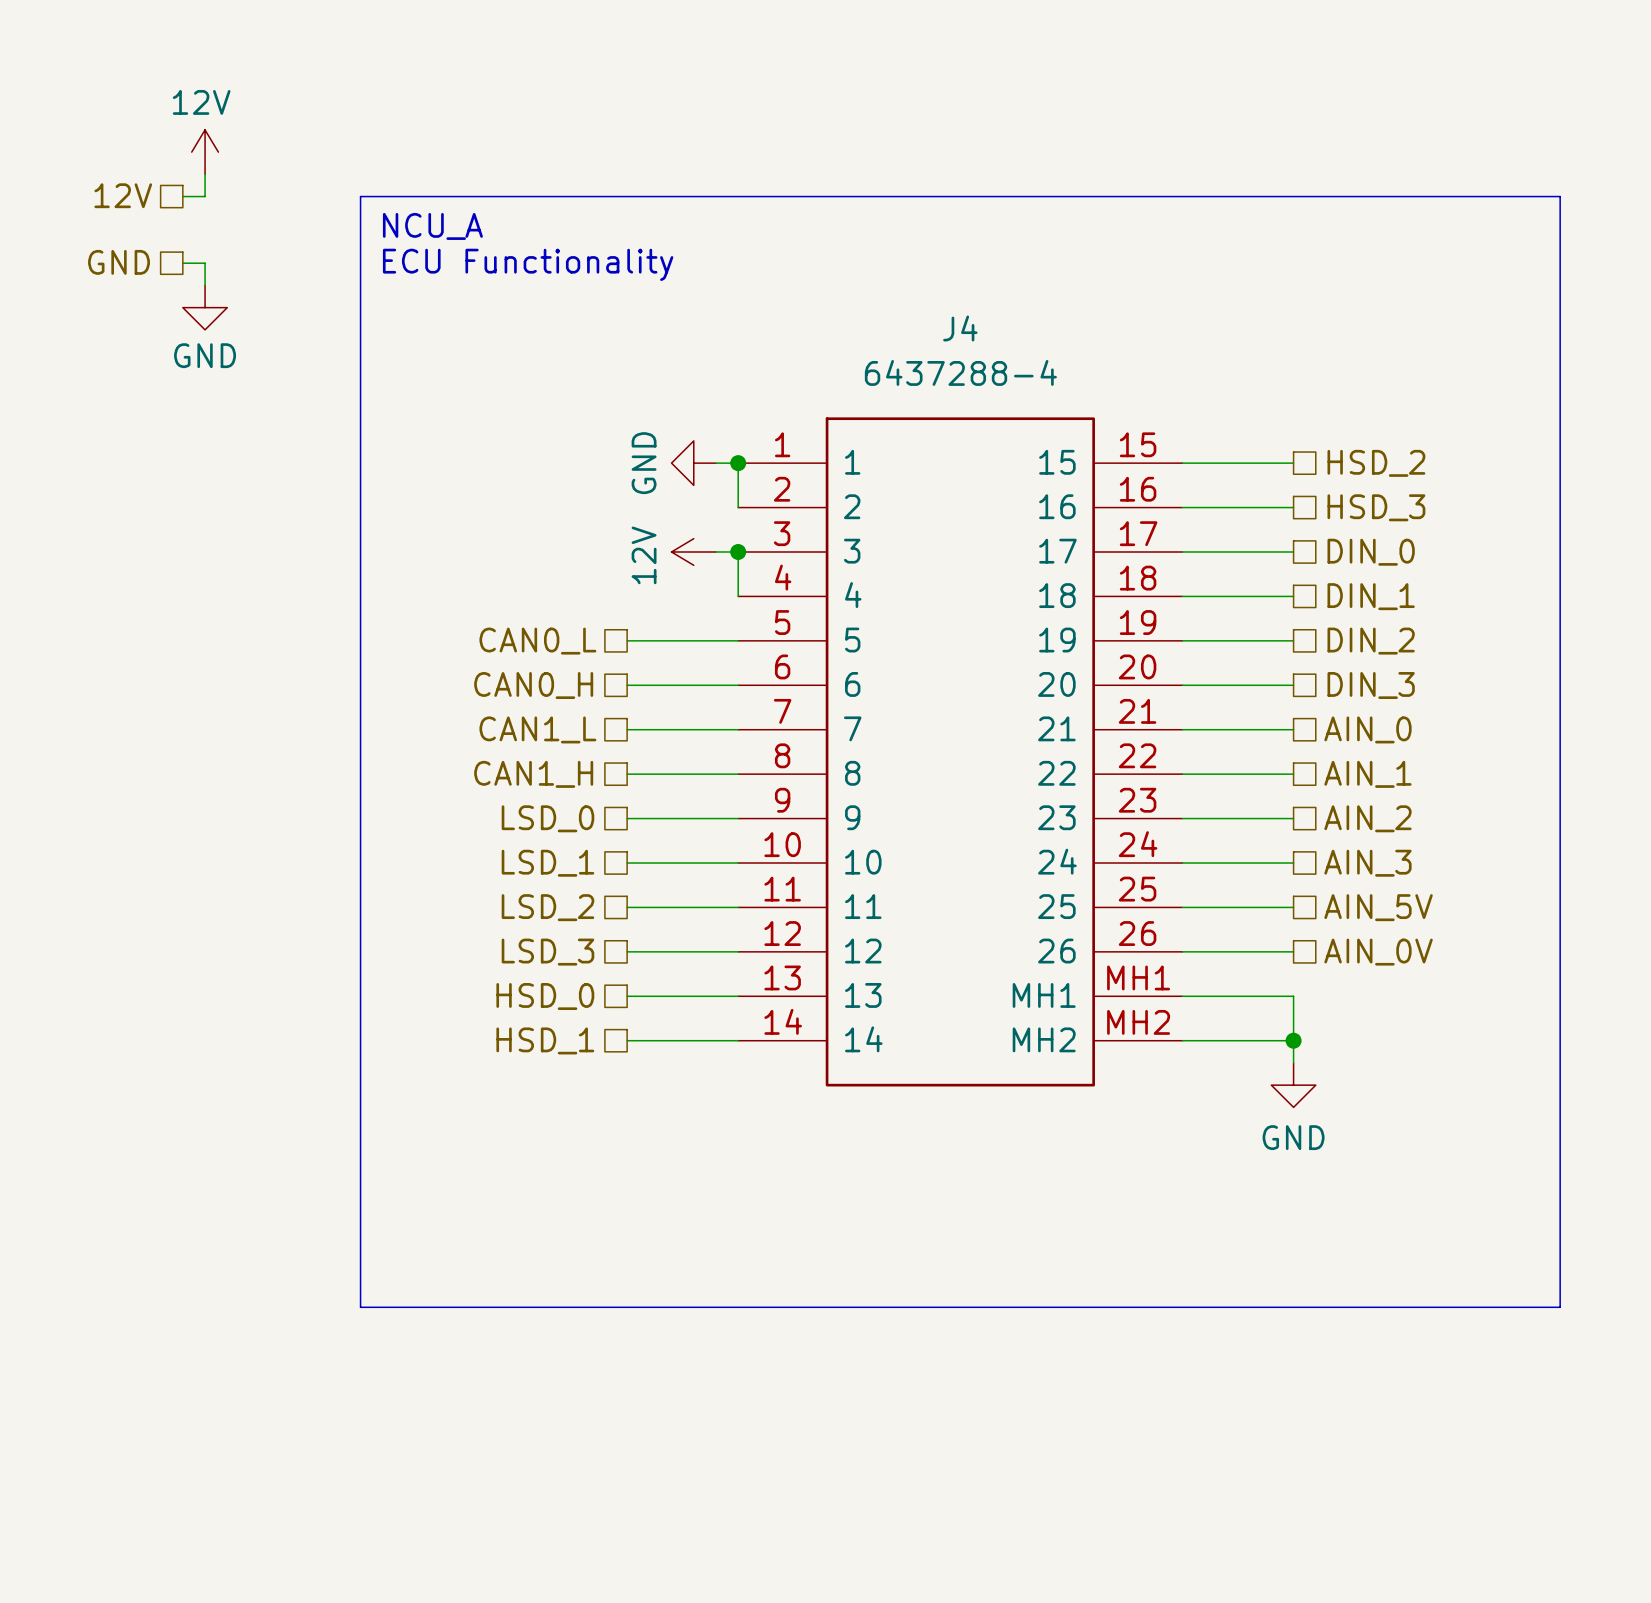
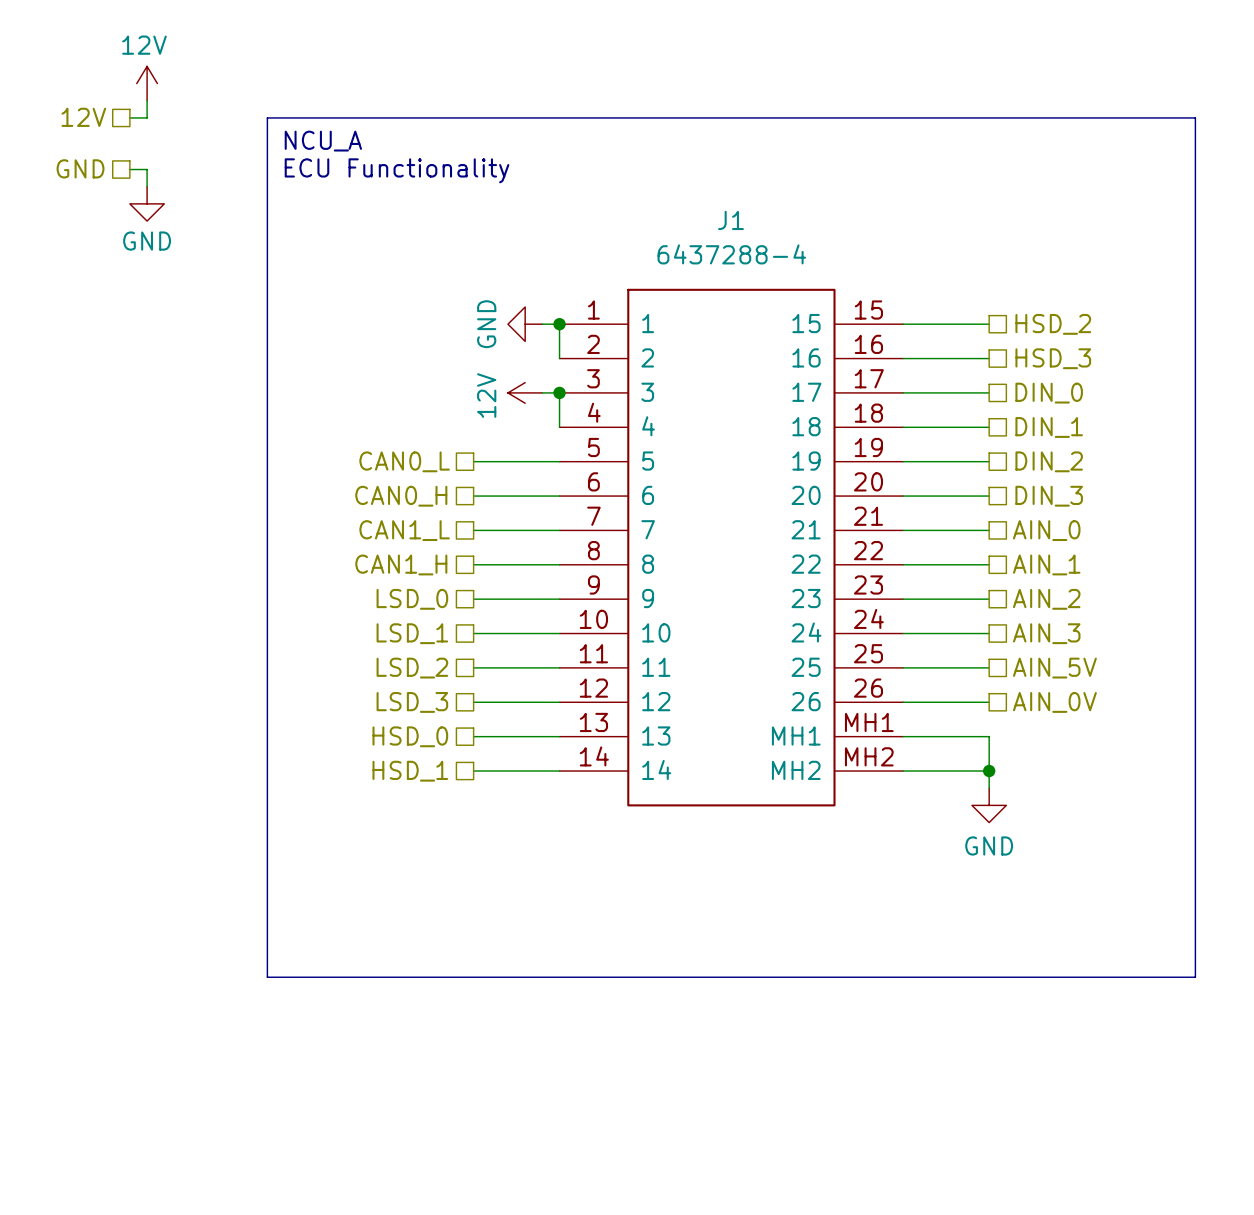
J4 name: J4 (960, 328) -> J1 (730, 220)

